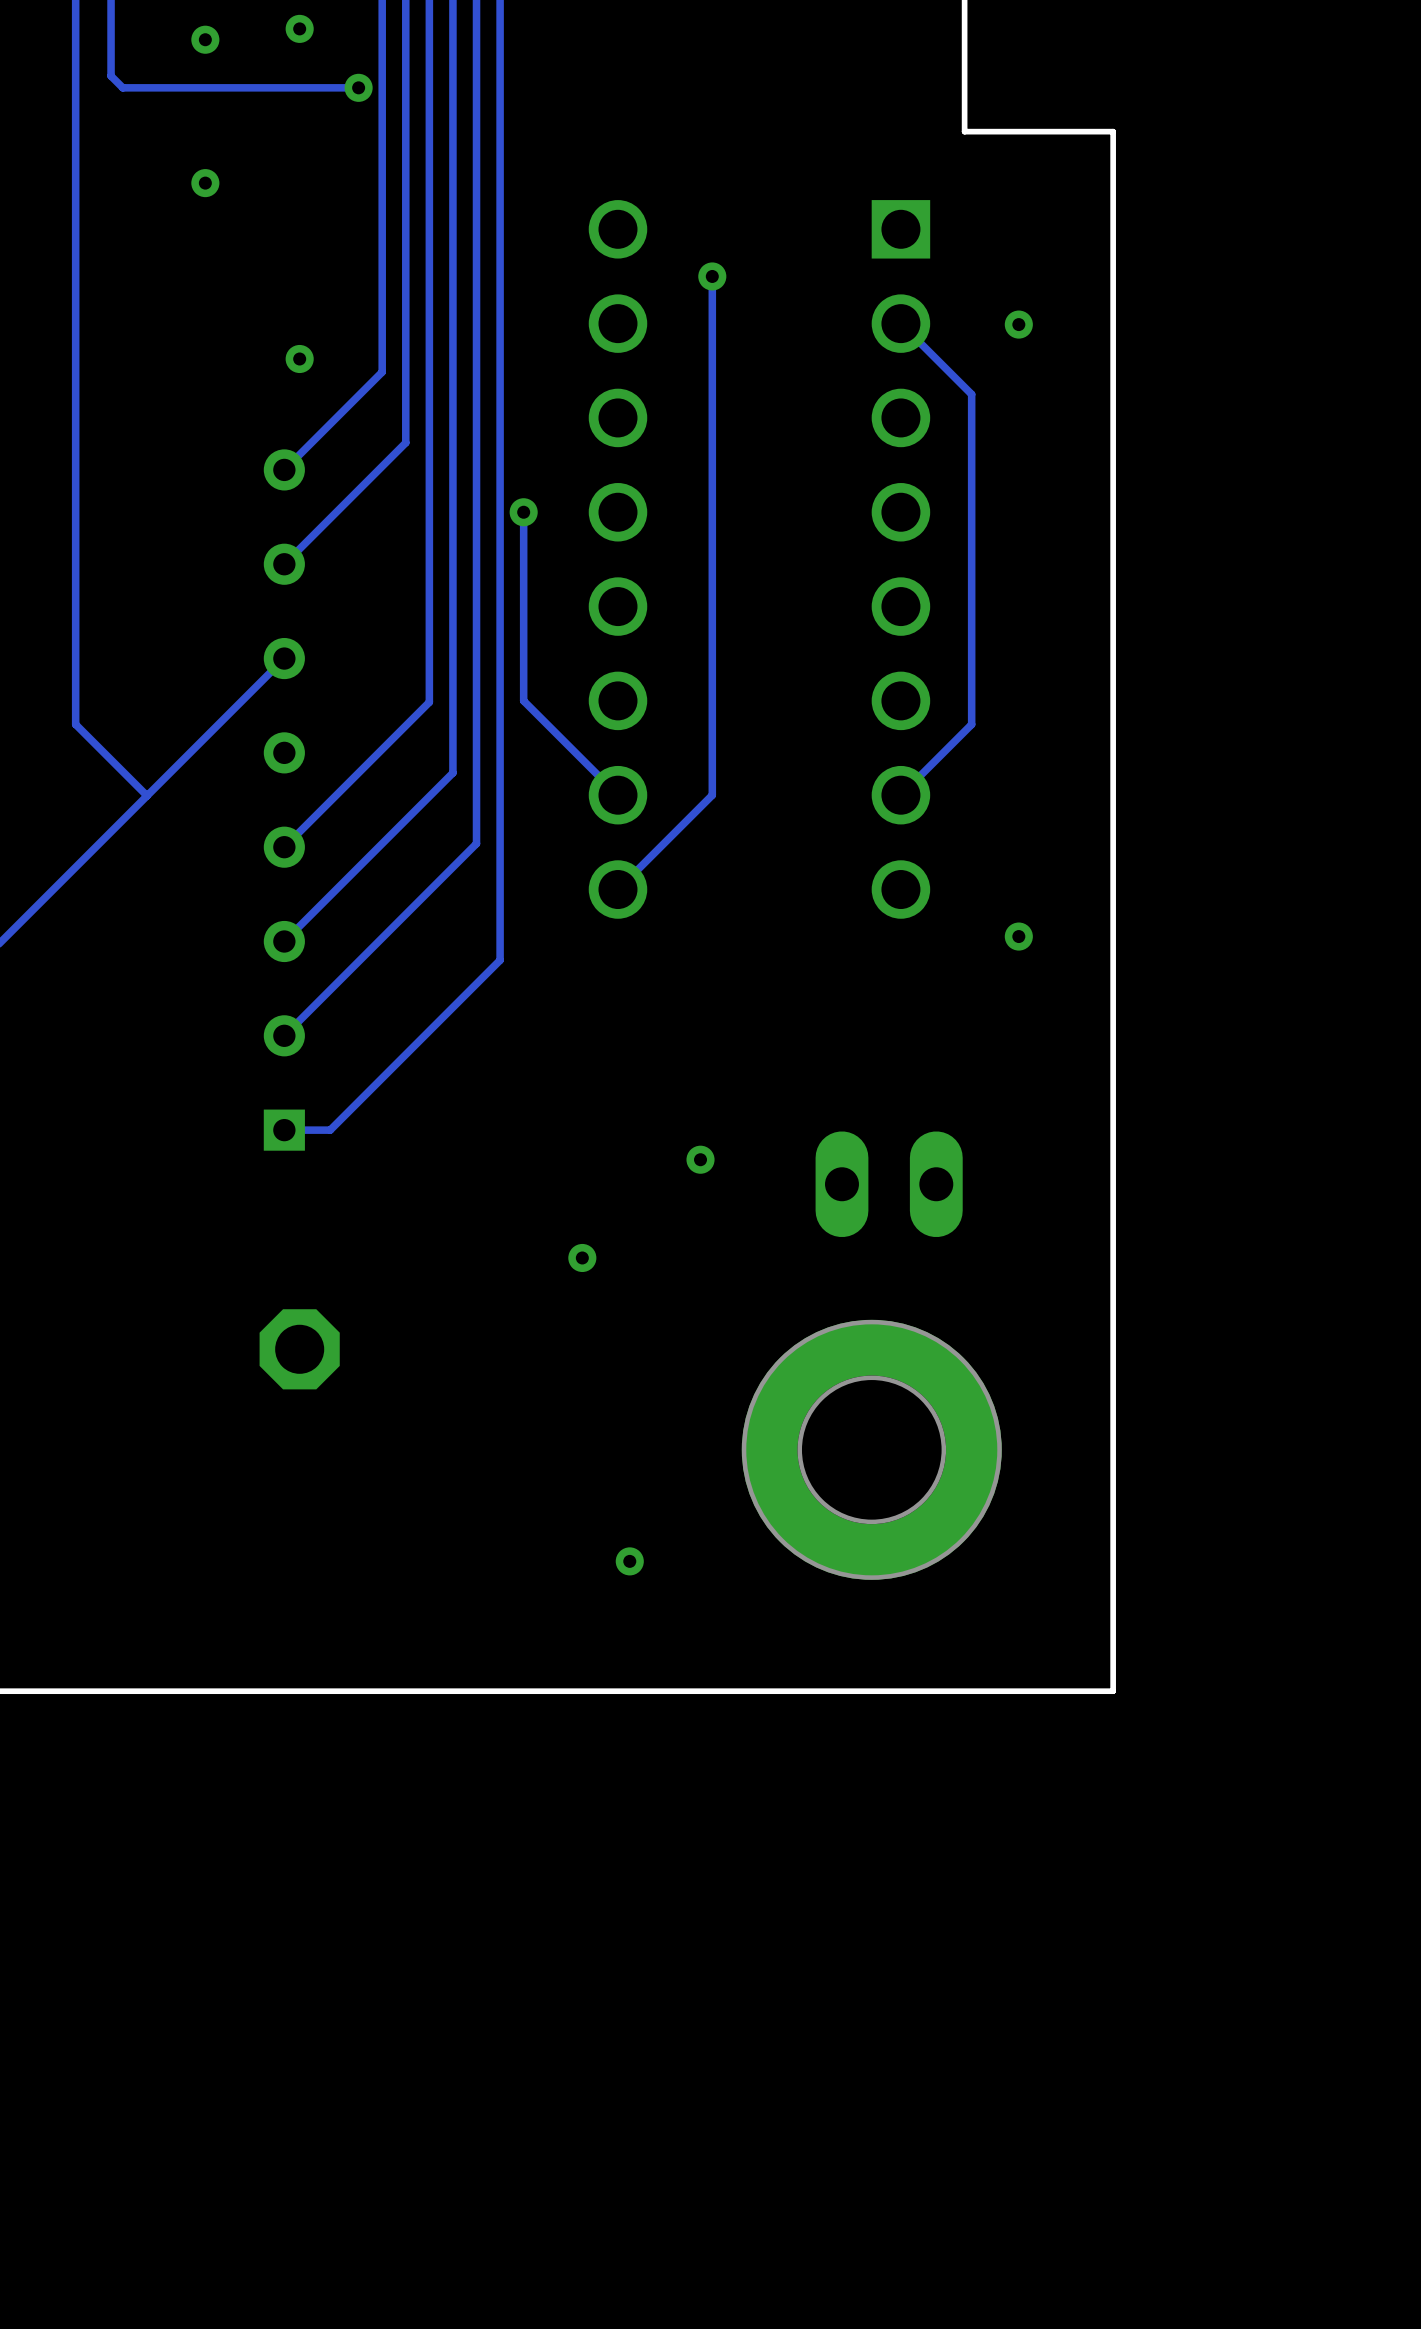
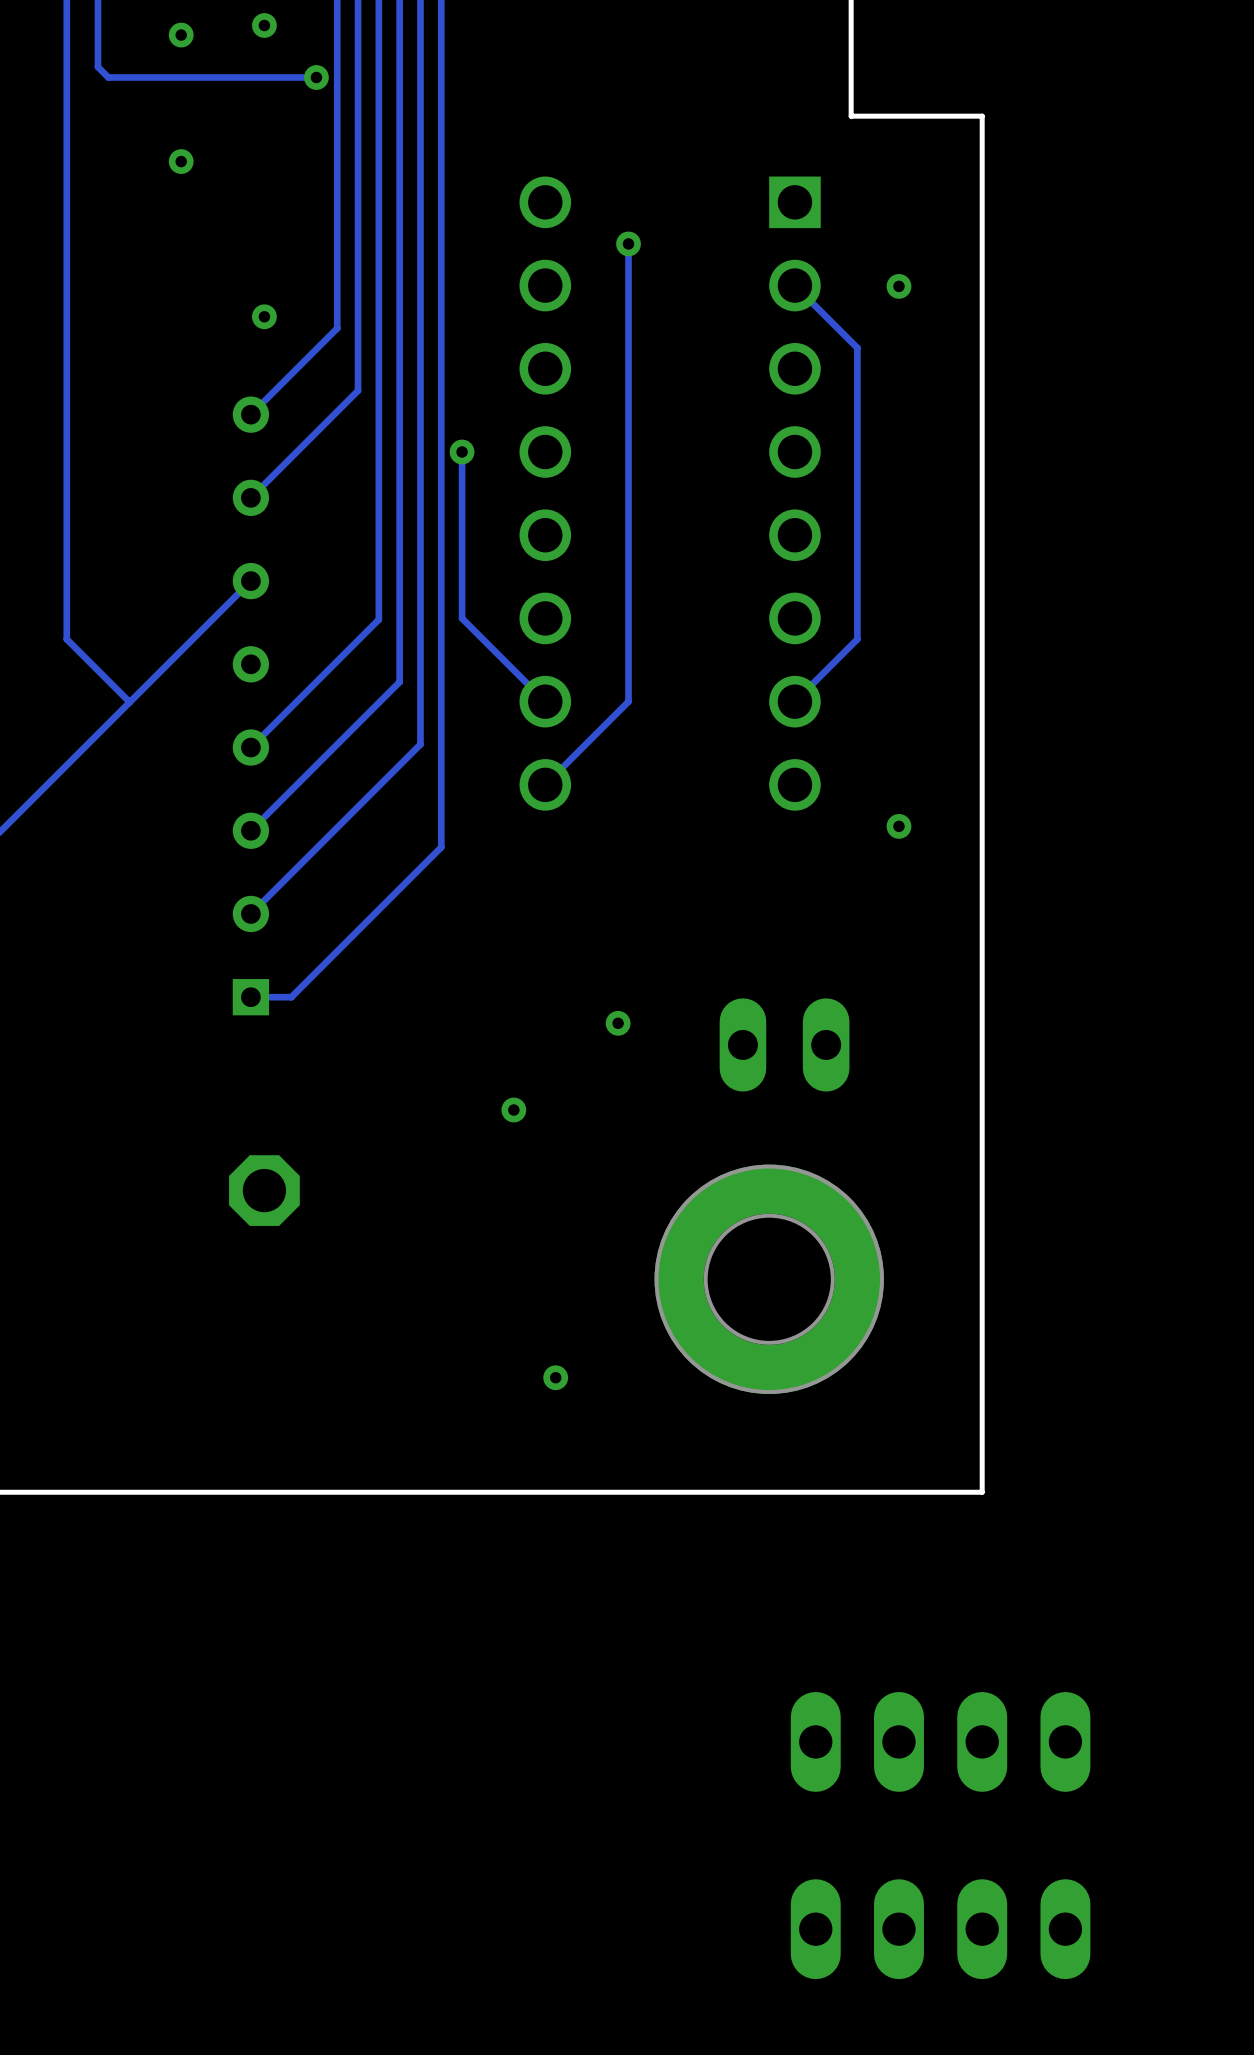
part: none -> (940, 1741)
part: none -> (940, 1929)

